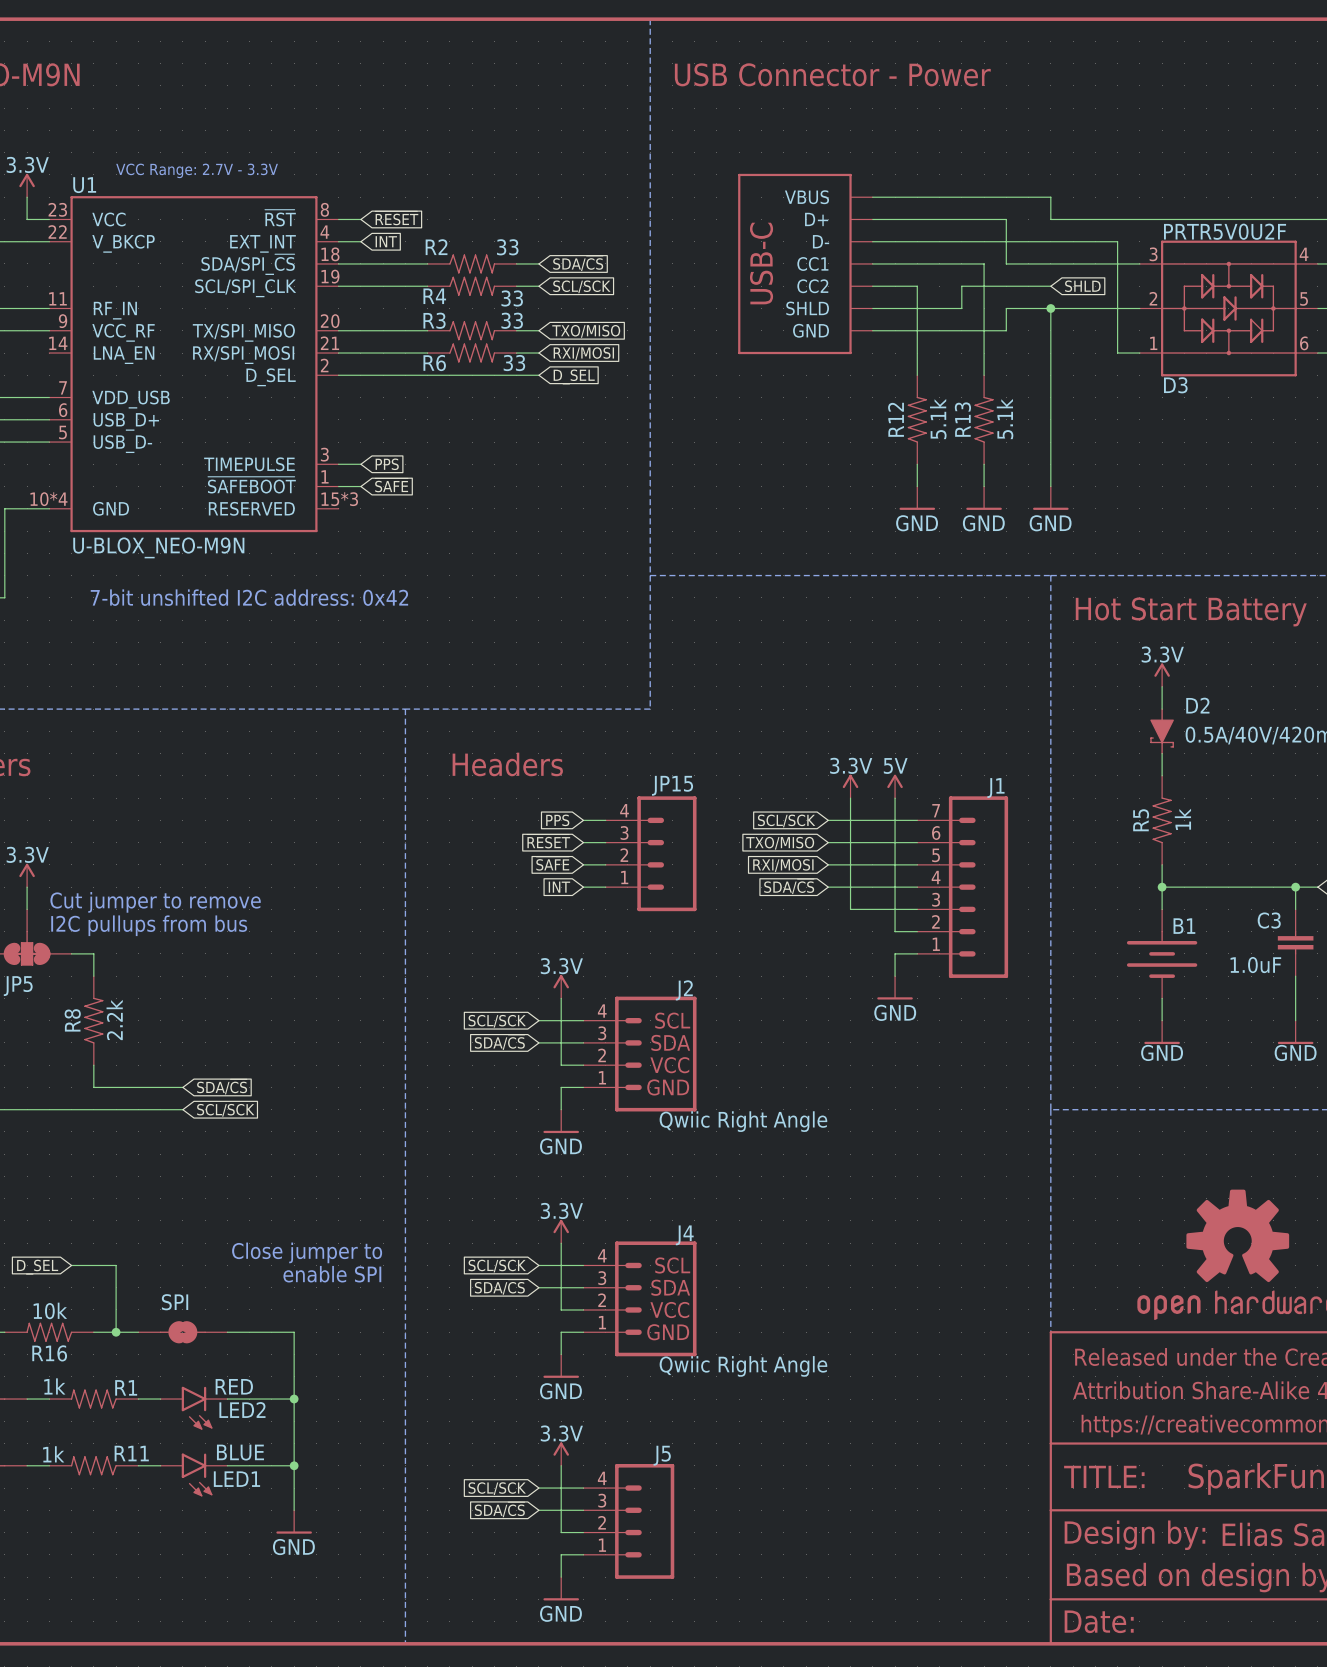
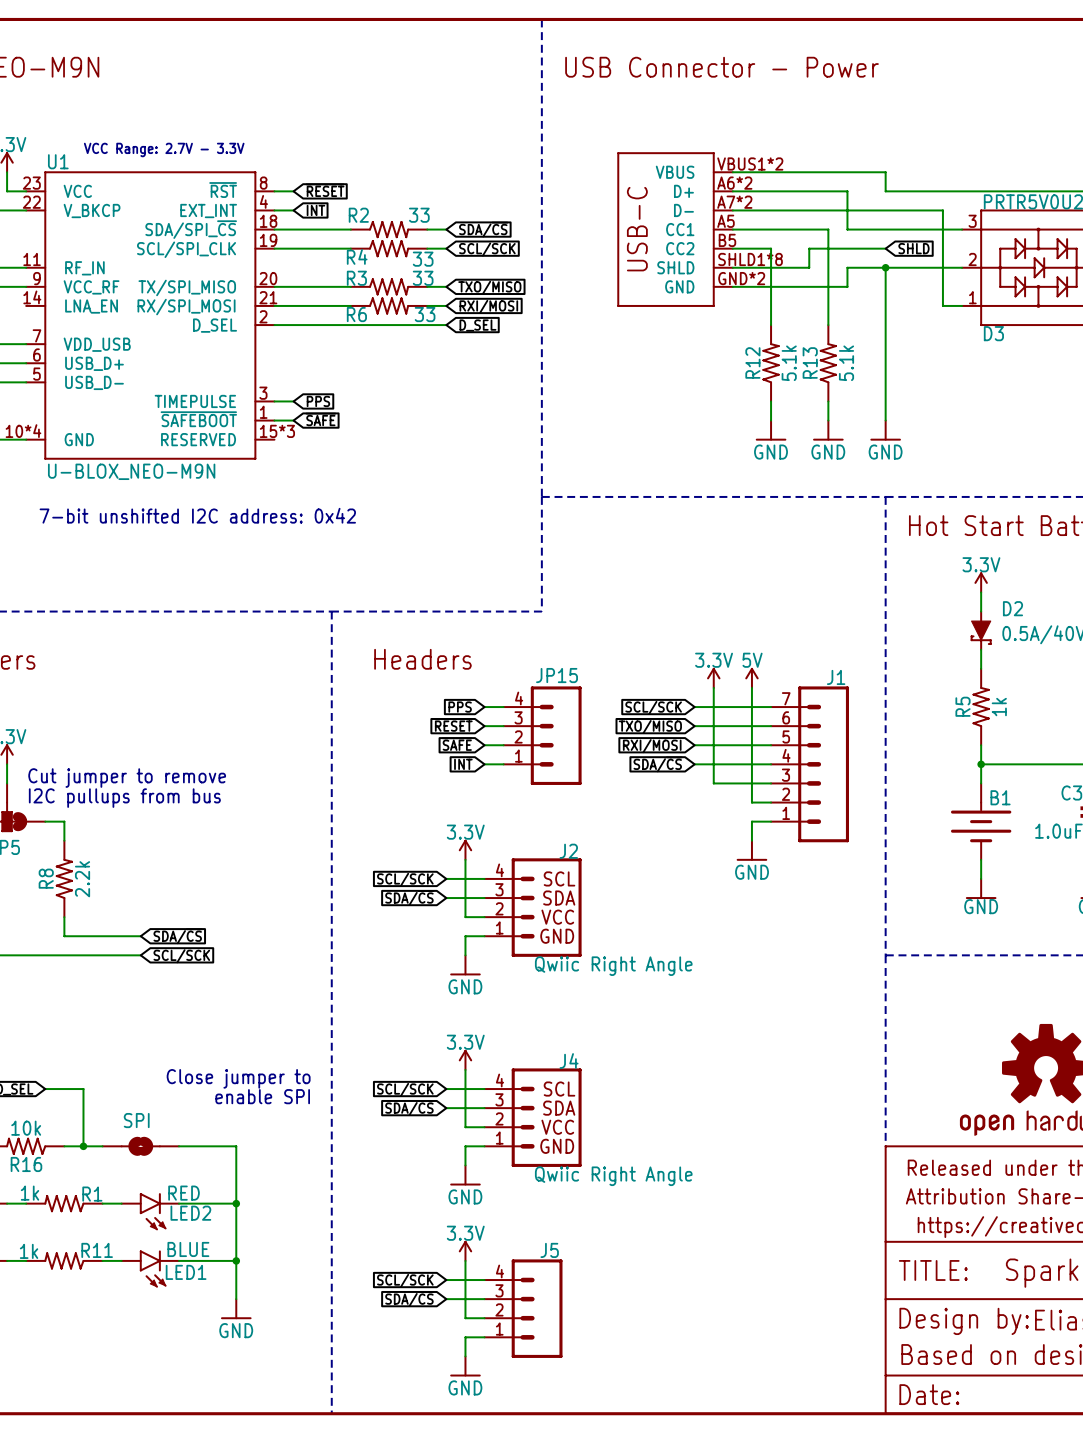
part pin number: none -> VBUS1*2 (750, 163)
part pin number: none -> A6*2 (734, 183)
part pin number: none -> A7*2 (734, 202)
part pin number: none -> A5 (725, 221)
part pin number: none -> B5 (727, 240)
part pin number: none -> SHLD1*8 (750, 259)
part pin number: none -> GND*2 (741, 278)

